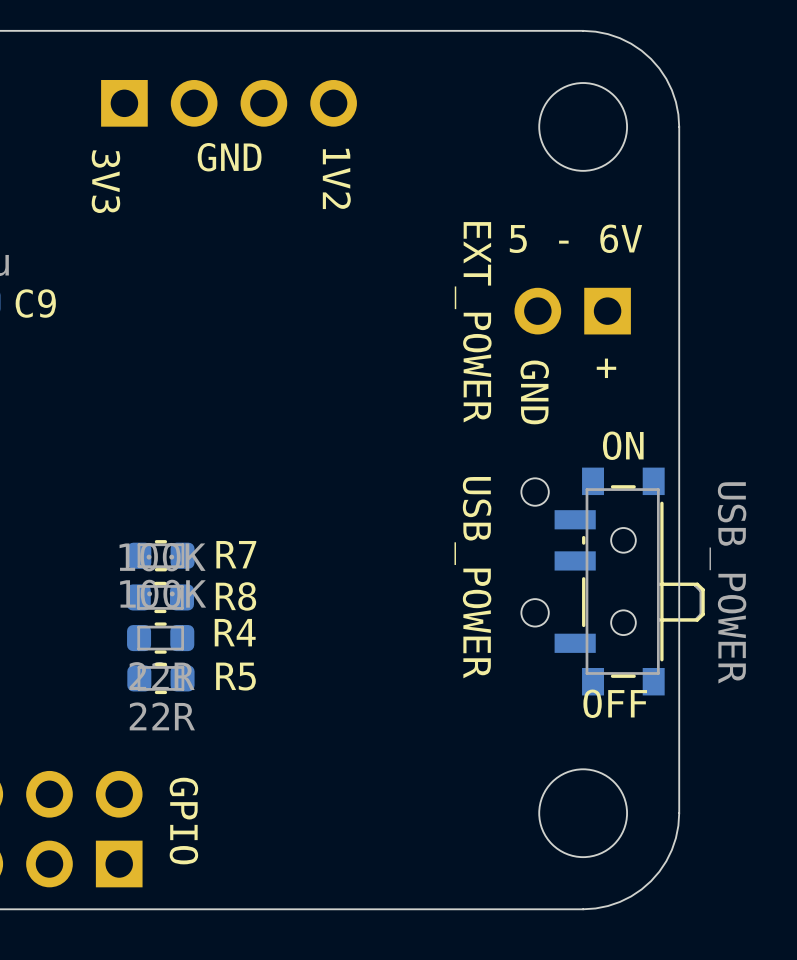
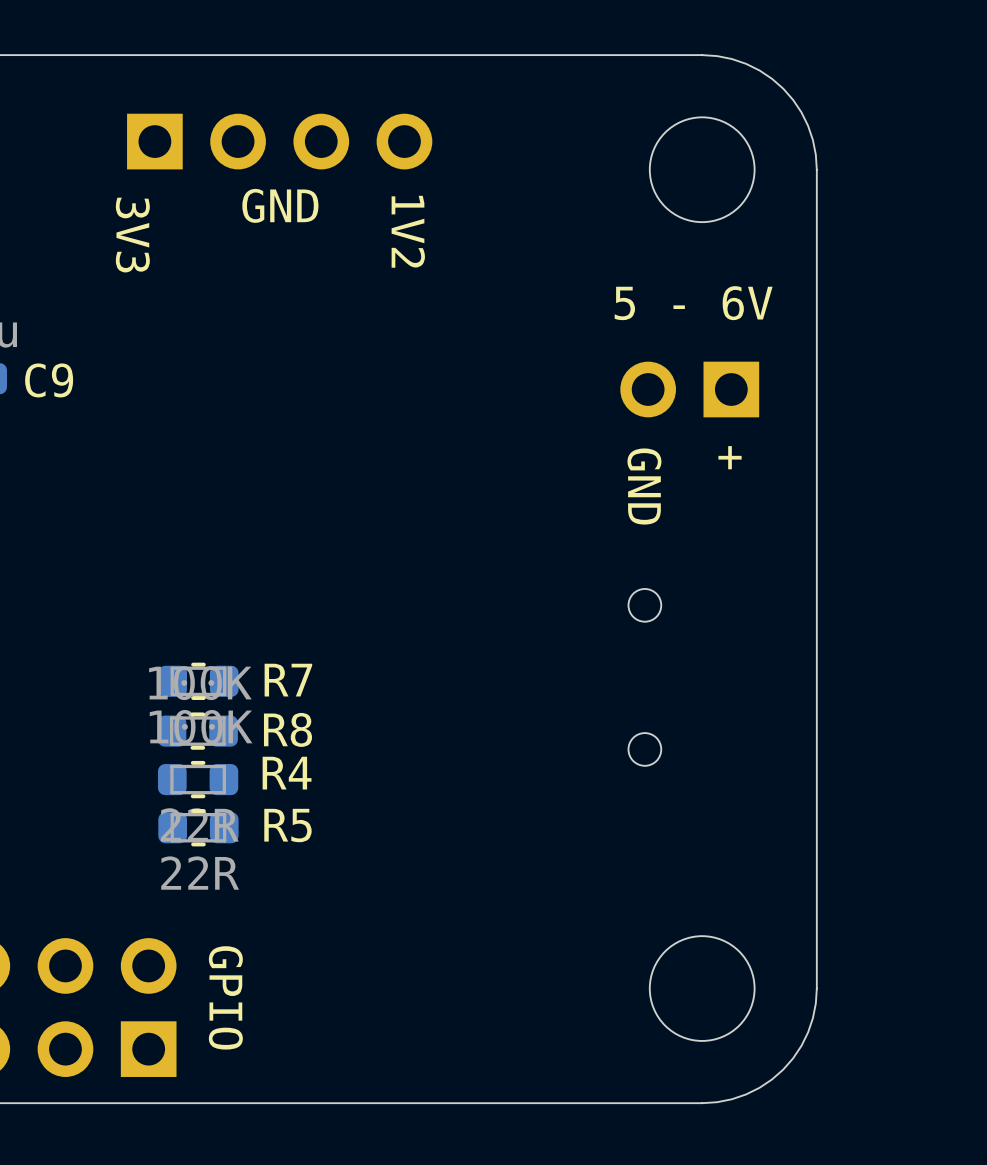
text: EXT_POWER (473, 322) -> none
text: ON (623, 445) -> none
USB_POWER: USB_POWER (629, 581) -> none
text: OFF (615, 703) -> none

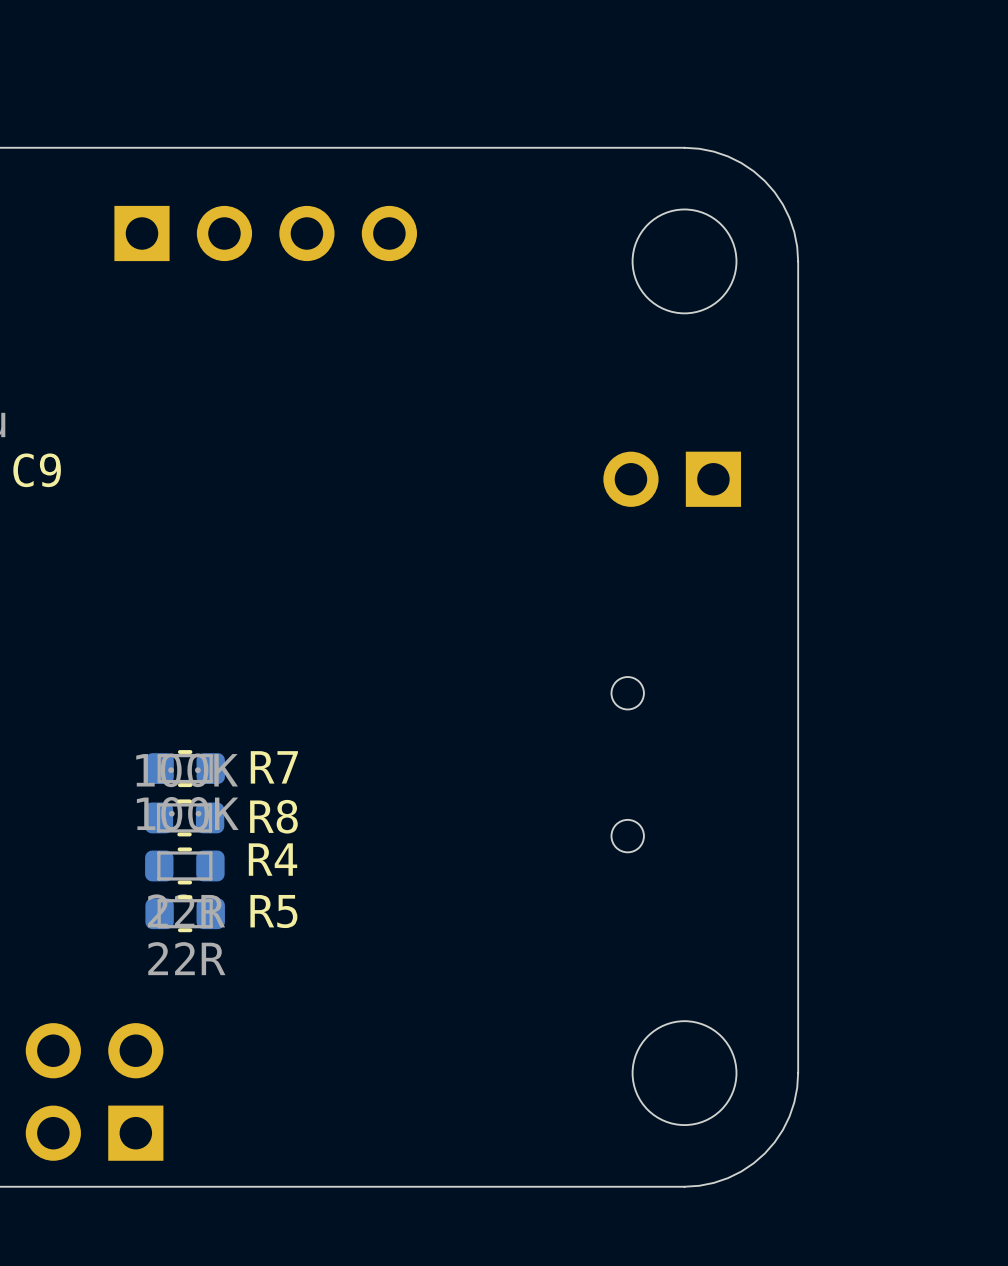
text: GND (280, 205) -> none
text: 1V2 (408, 231) -> none
text: 3V3 (132, 235) -> none
text: 5 - 6V (693, 303) -> none
text: + (730, 457) -> none
text: GND (644, 486) -> none
text: GPIO (225, 997) -> none

